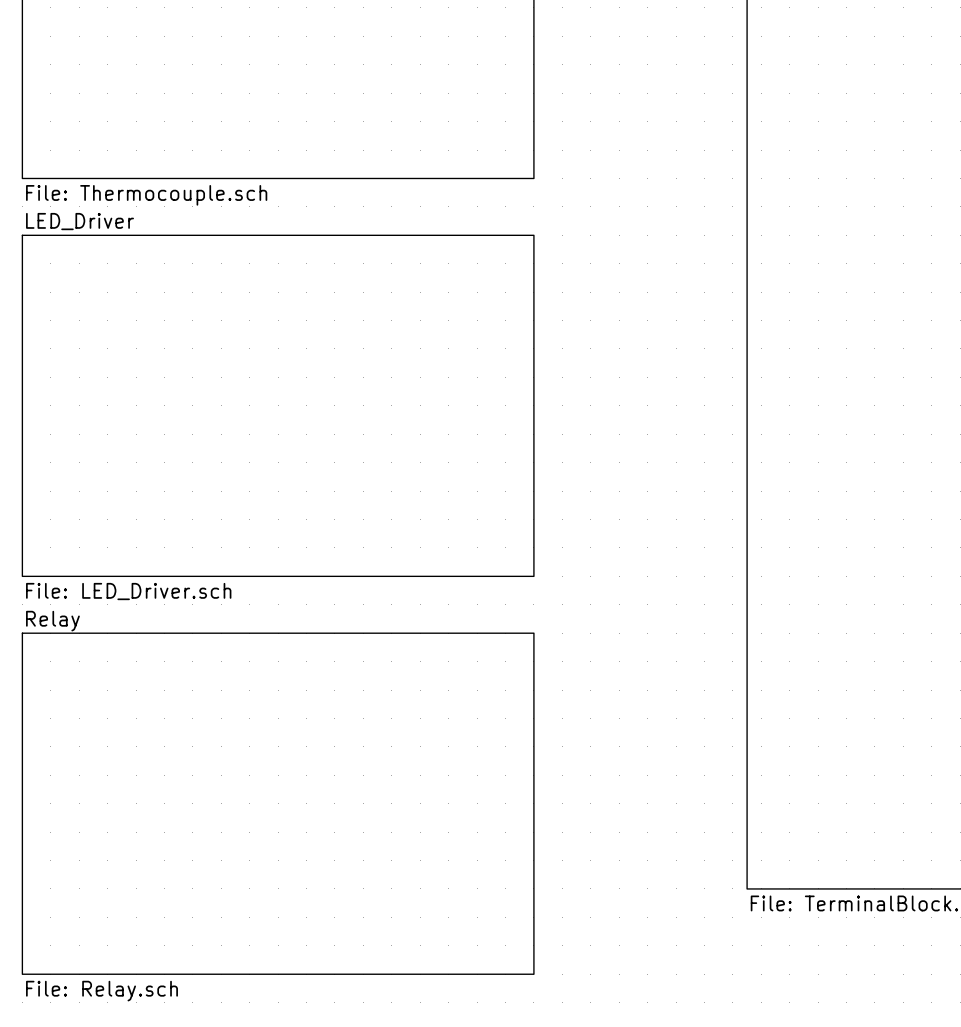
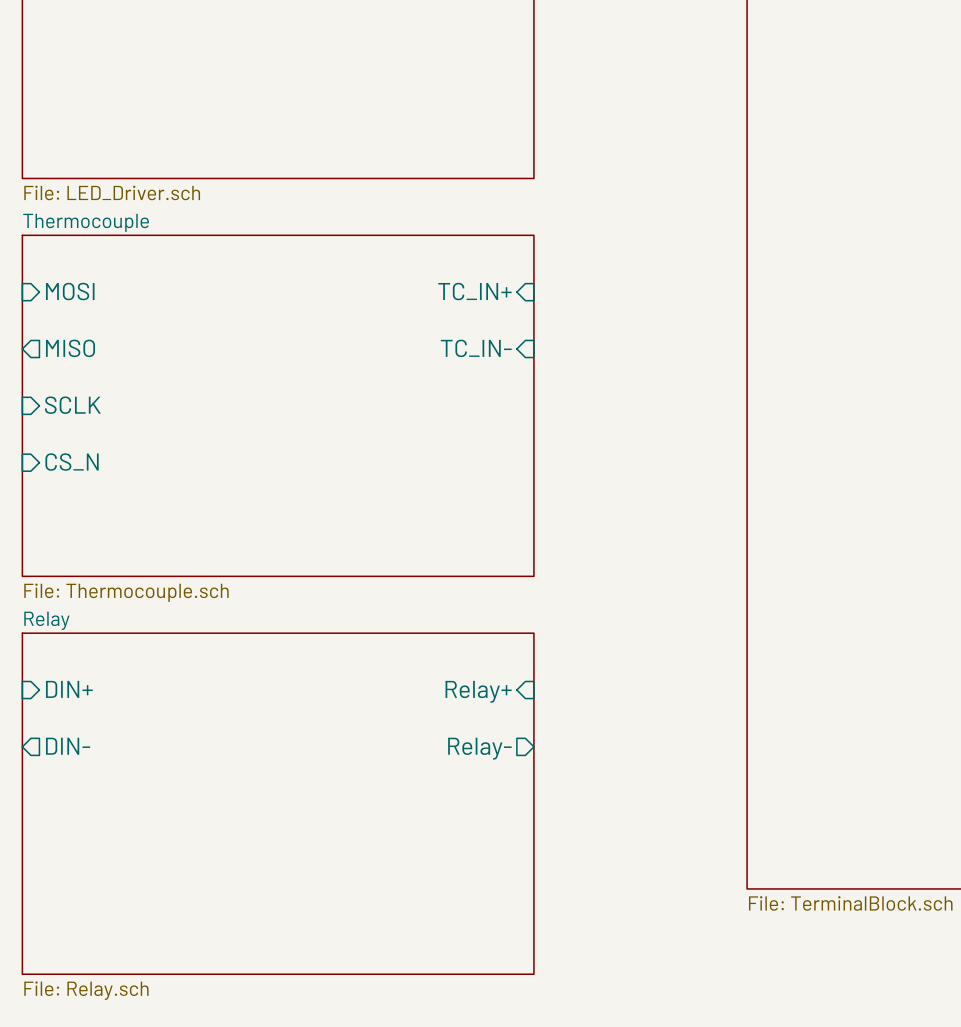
sheet value: File: Thermocouple.sch (146, 195) -> File: LED_Driver.sch (112, 192)
sheet LED_Driver name: LED_Driver (80, 221) -> Thermocouple (86, 222)
sheet pin: none -> MOSI (70, 291)
sheet pin: none -> TC_IN+ (474, 291)
sheet pin: none -> MISO (70, 348)
sheet pin: none -> TC_IN- (476, 348)
sheet pin: none -> SCLK (72, 405)
sheet pin: none -> CS_N (72, 462)
sheet LED_Driver value: File: LED_Driver.sch (128, 591) -> File: Thermocouple.sch (126, 592)
sheet pin: none -> DIN+ (69, 689)
sheet pin: none -> Relay+ (478, 691)
sheet pin: none -> DIN- (68, 746)
sheet pin: none -> Relay- (479, 748)

